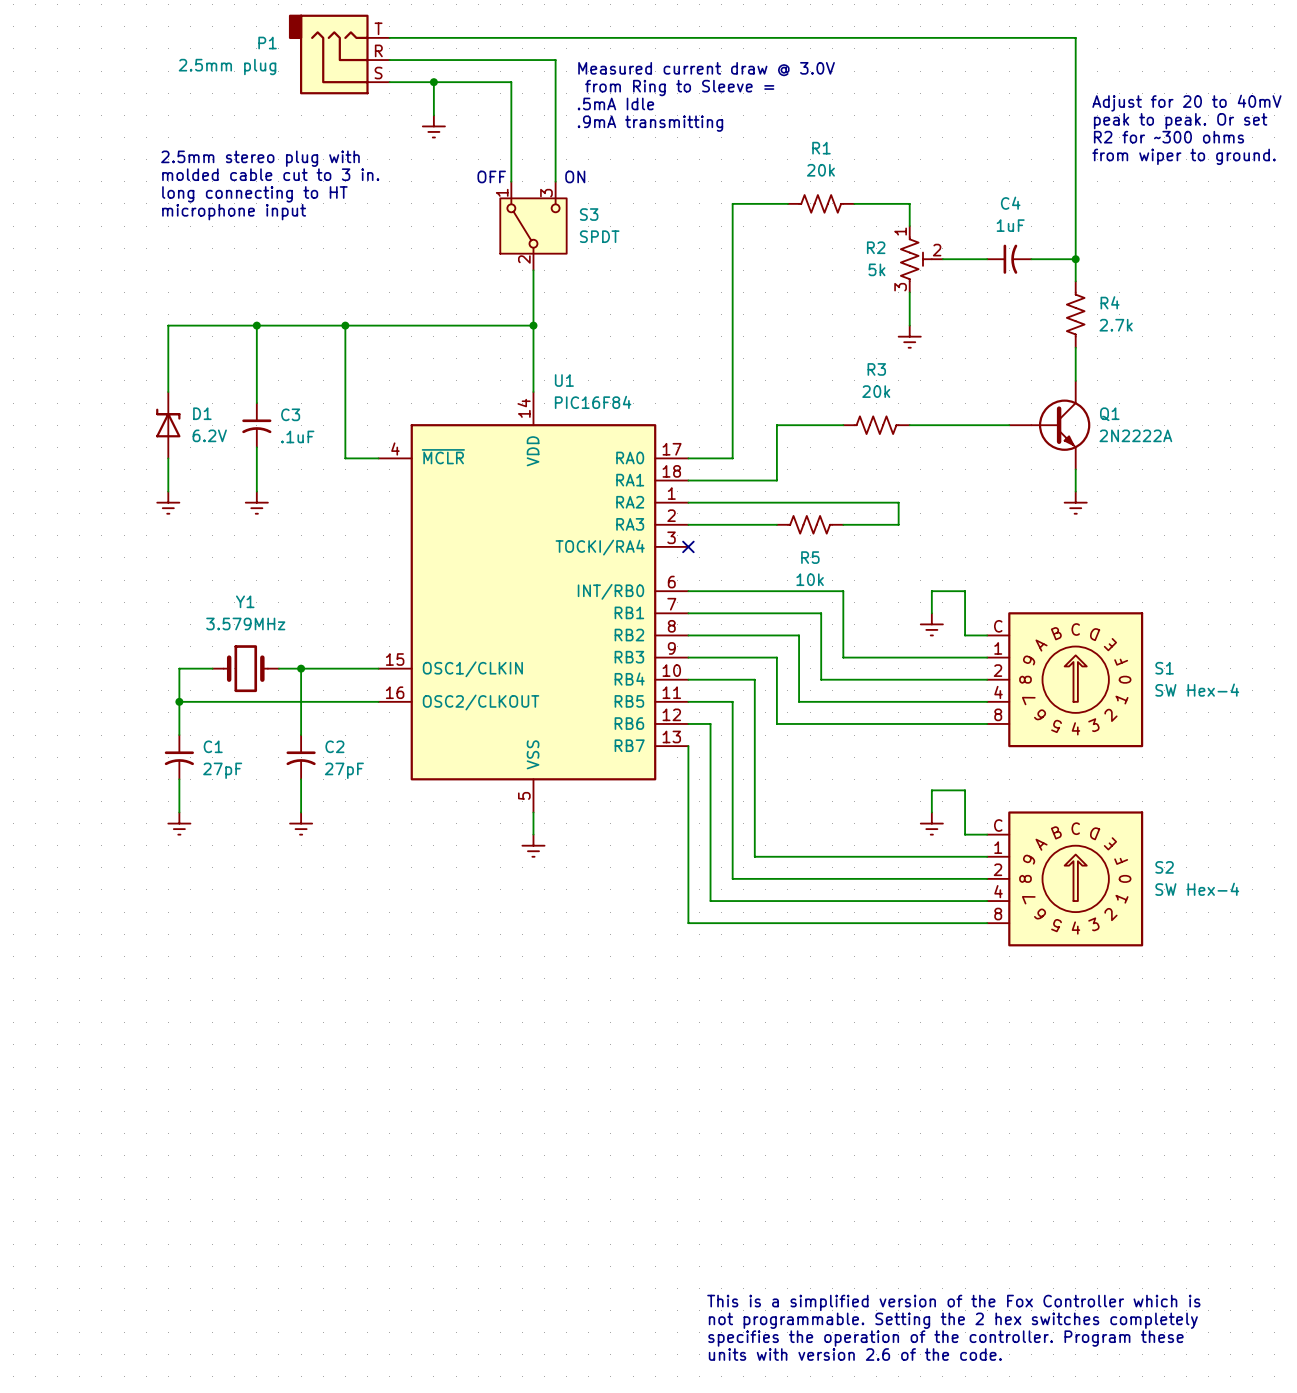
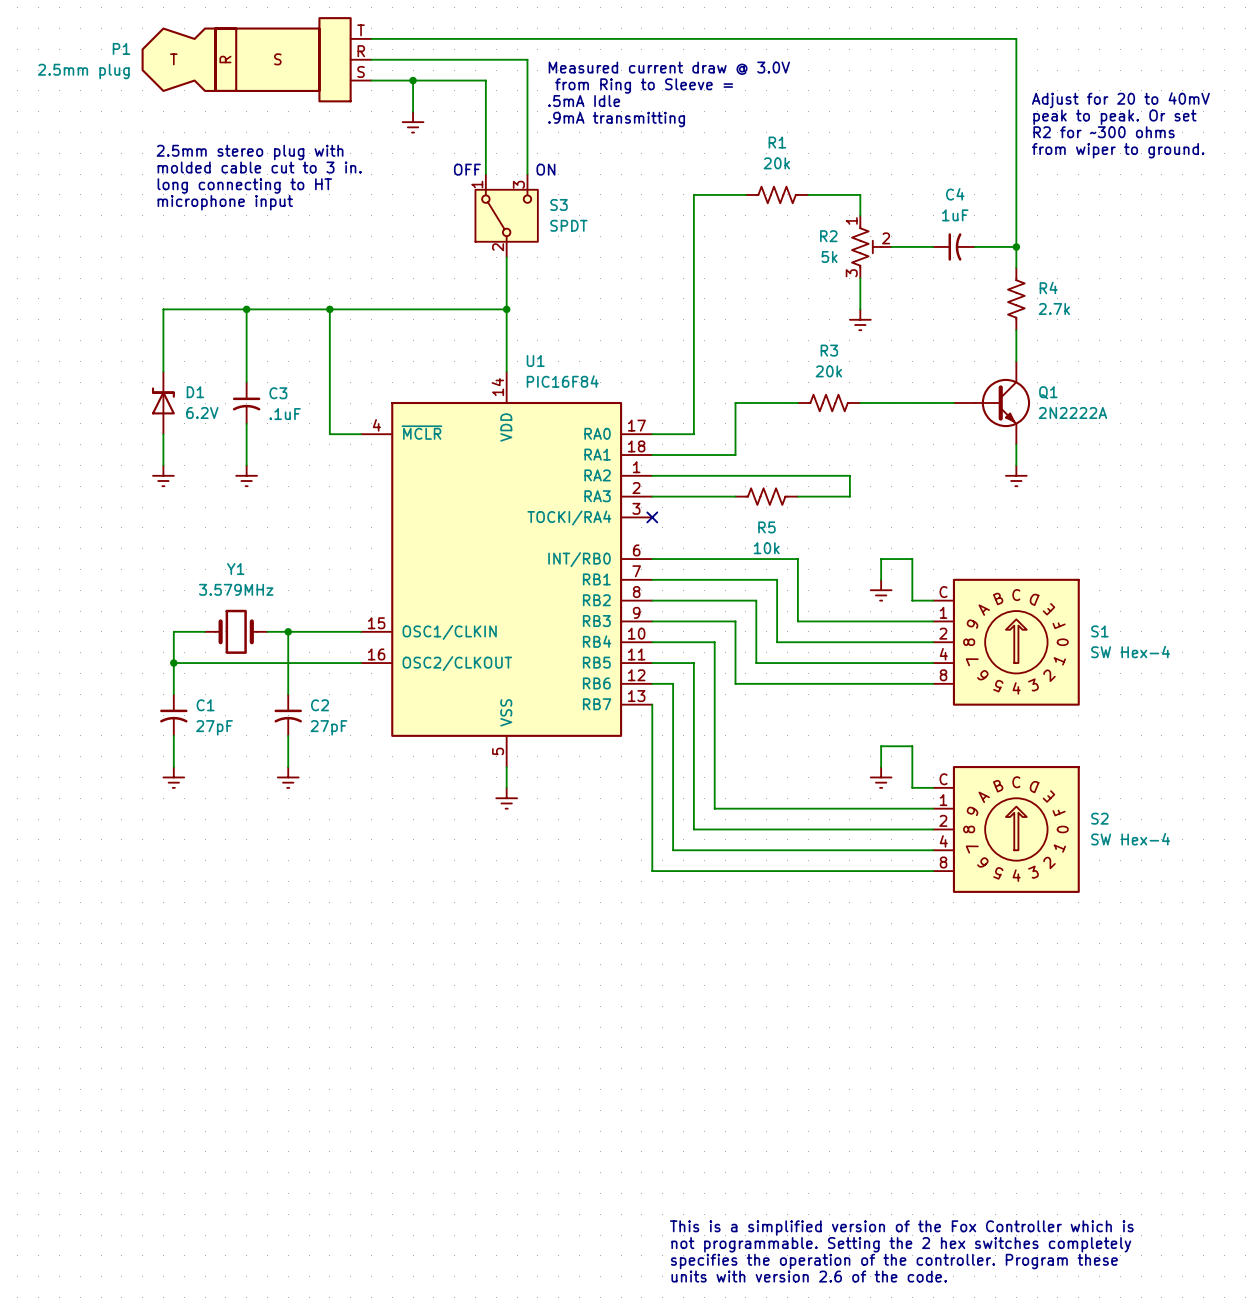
P1 symbol: [288, 14, 390, 95] -> [141, 17, 372, 103]
P1 name position: P1 (267, 43) -> P1 (121, 48)
P1 value position: 2.5mm plug (227, 66) -> 2.5mm plug (83, 71)

